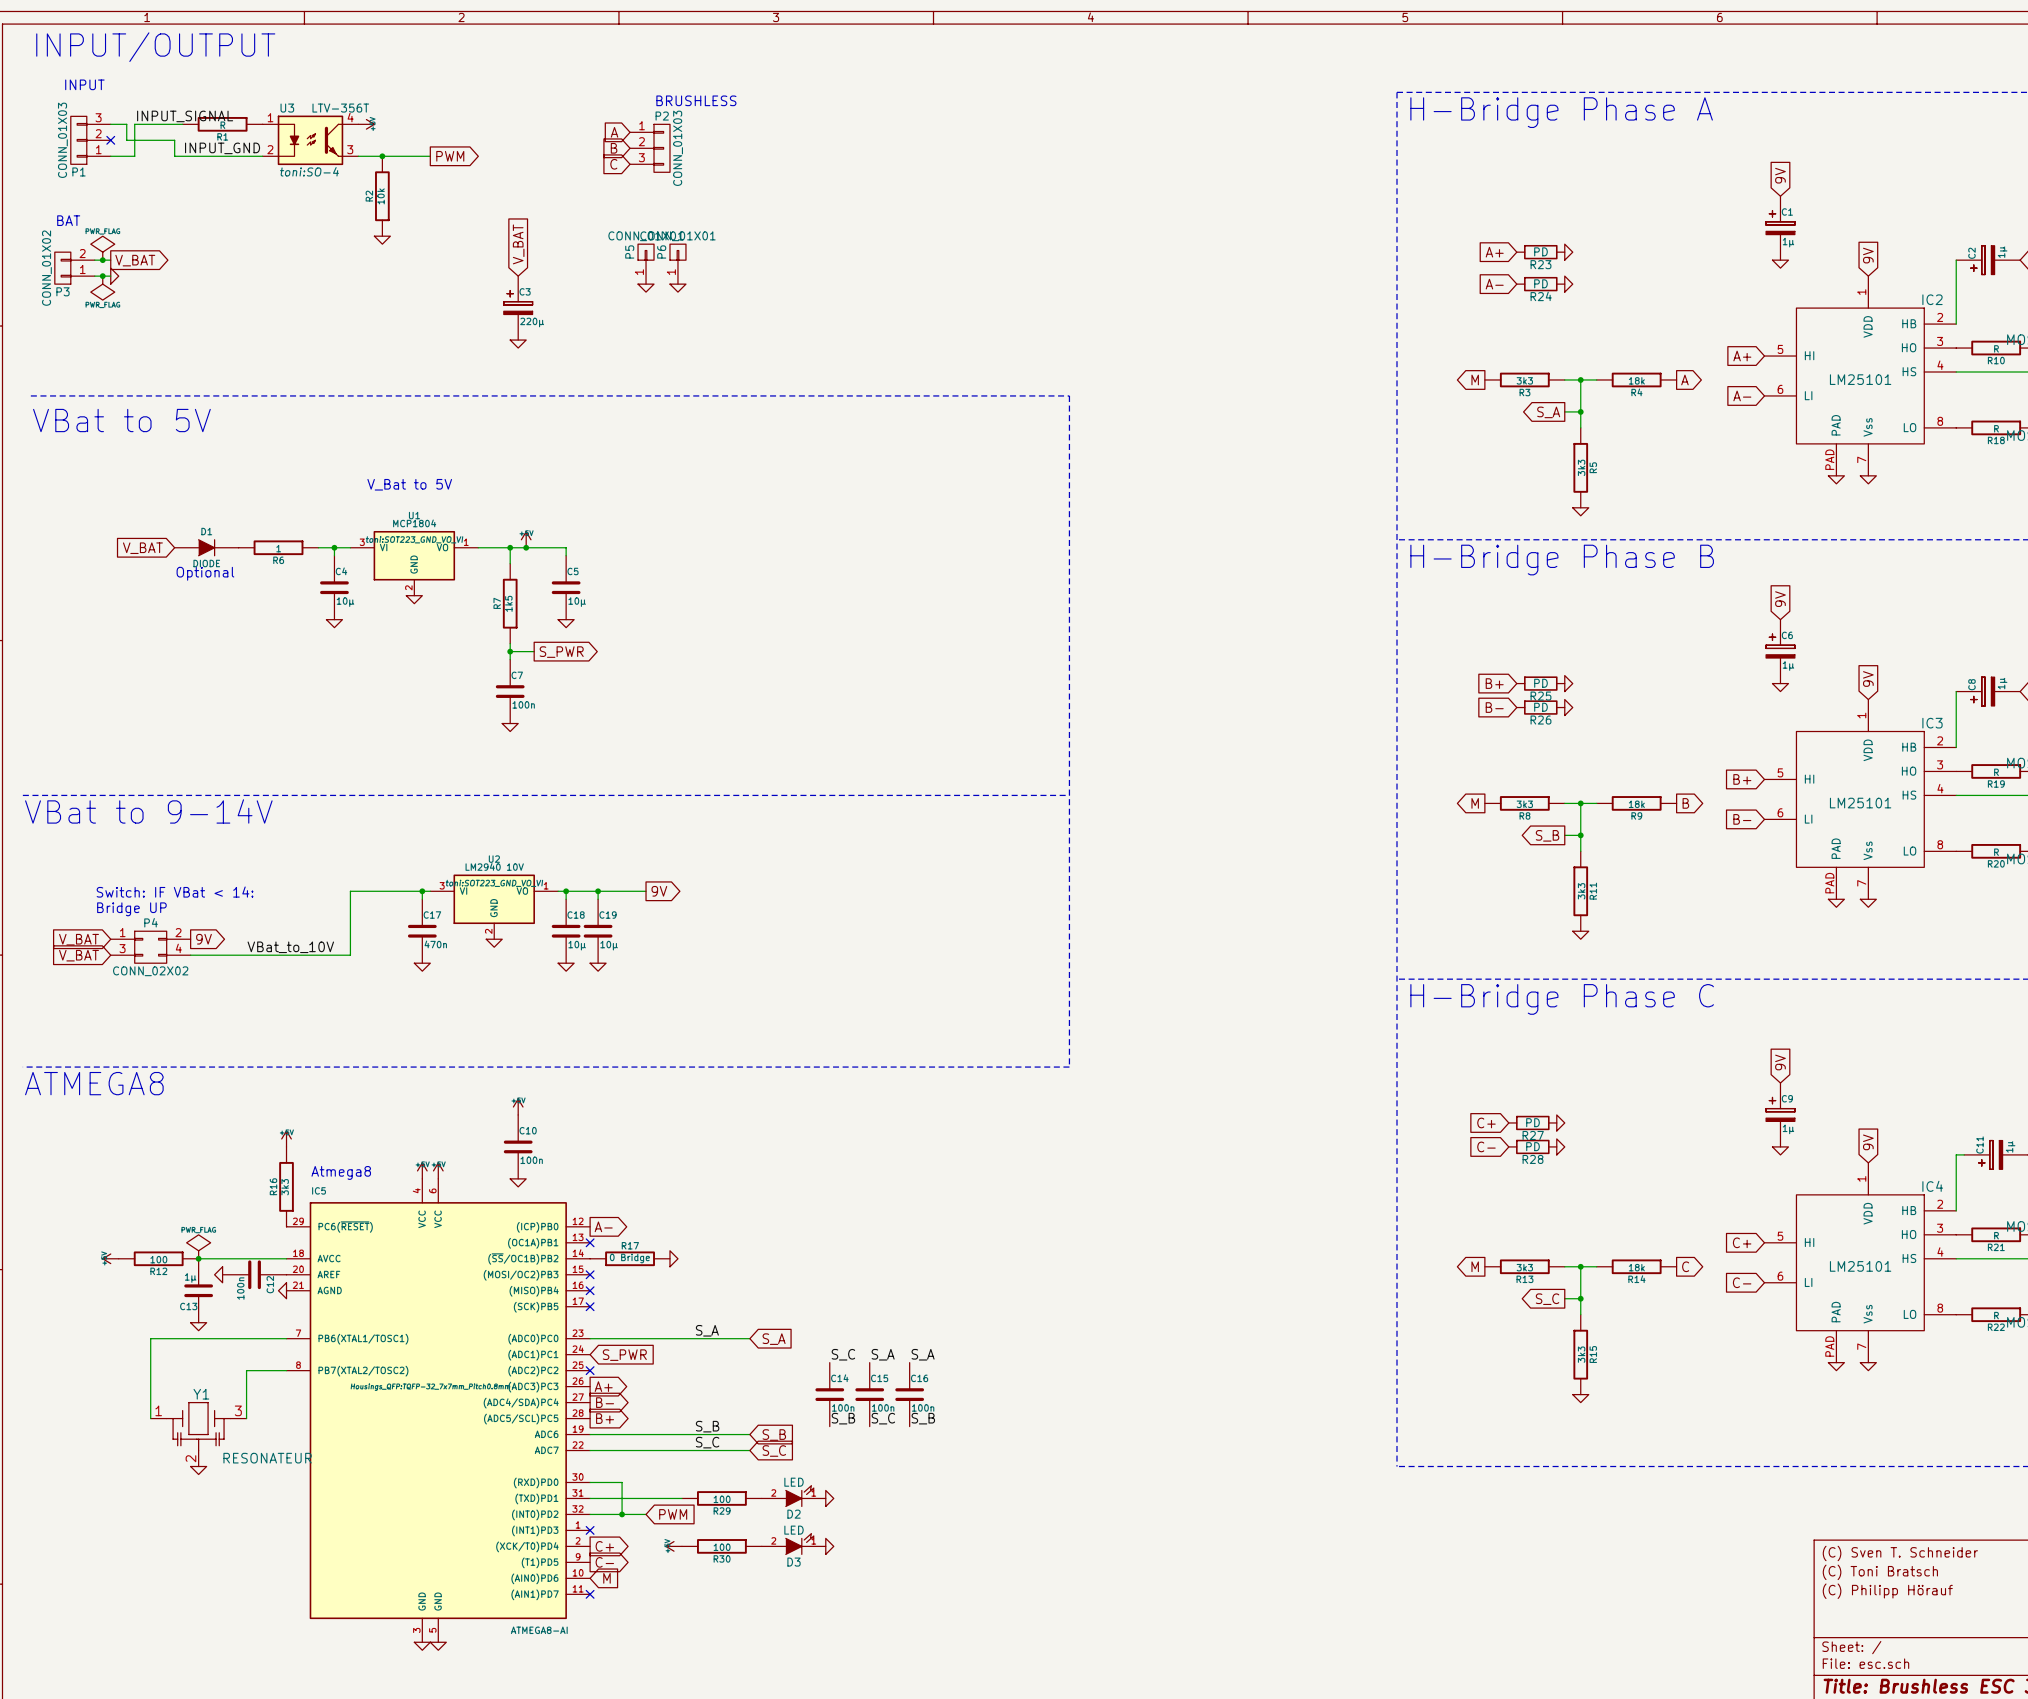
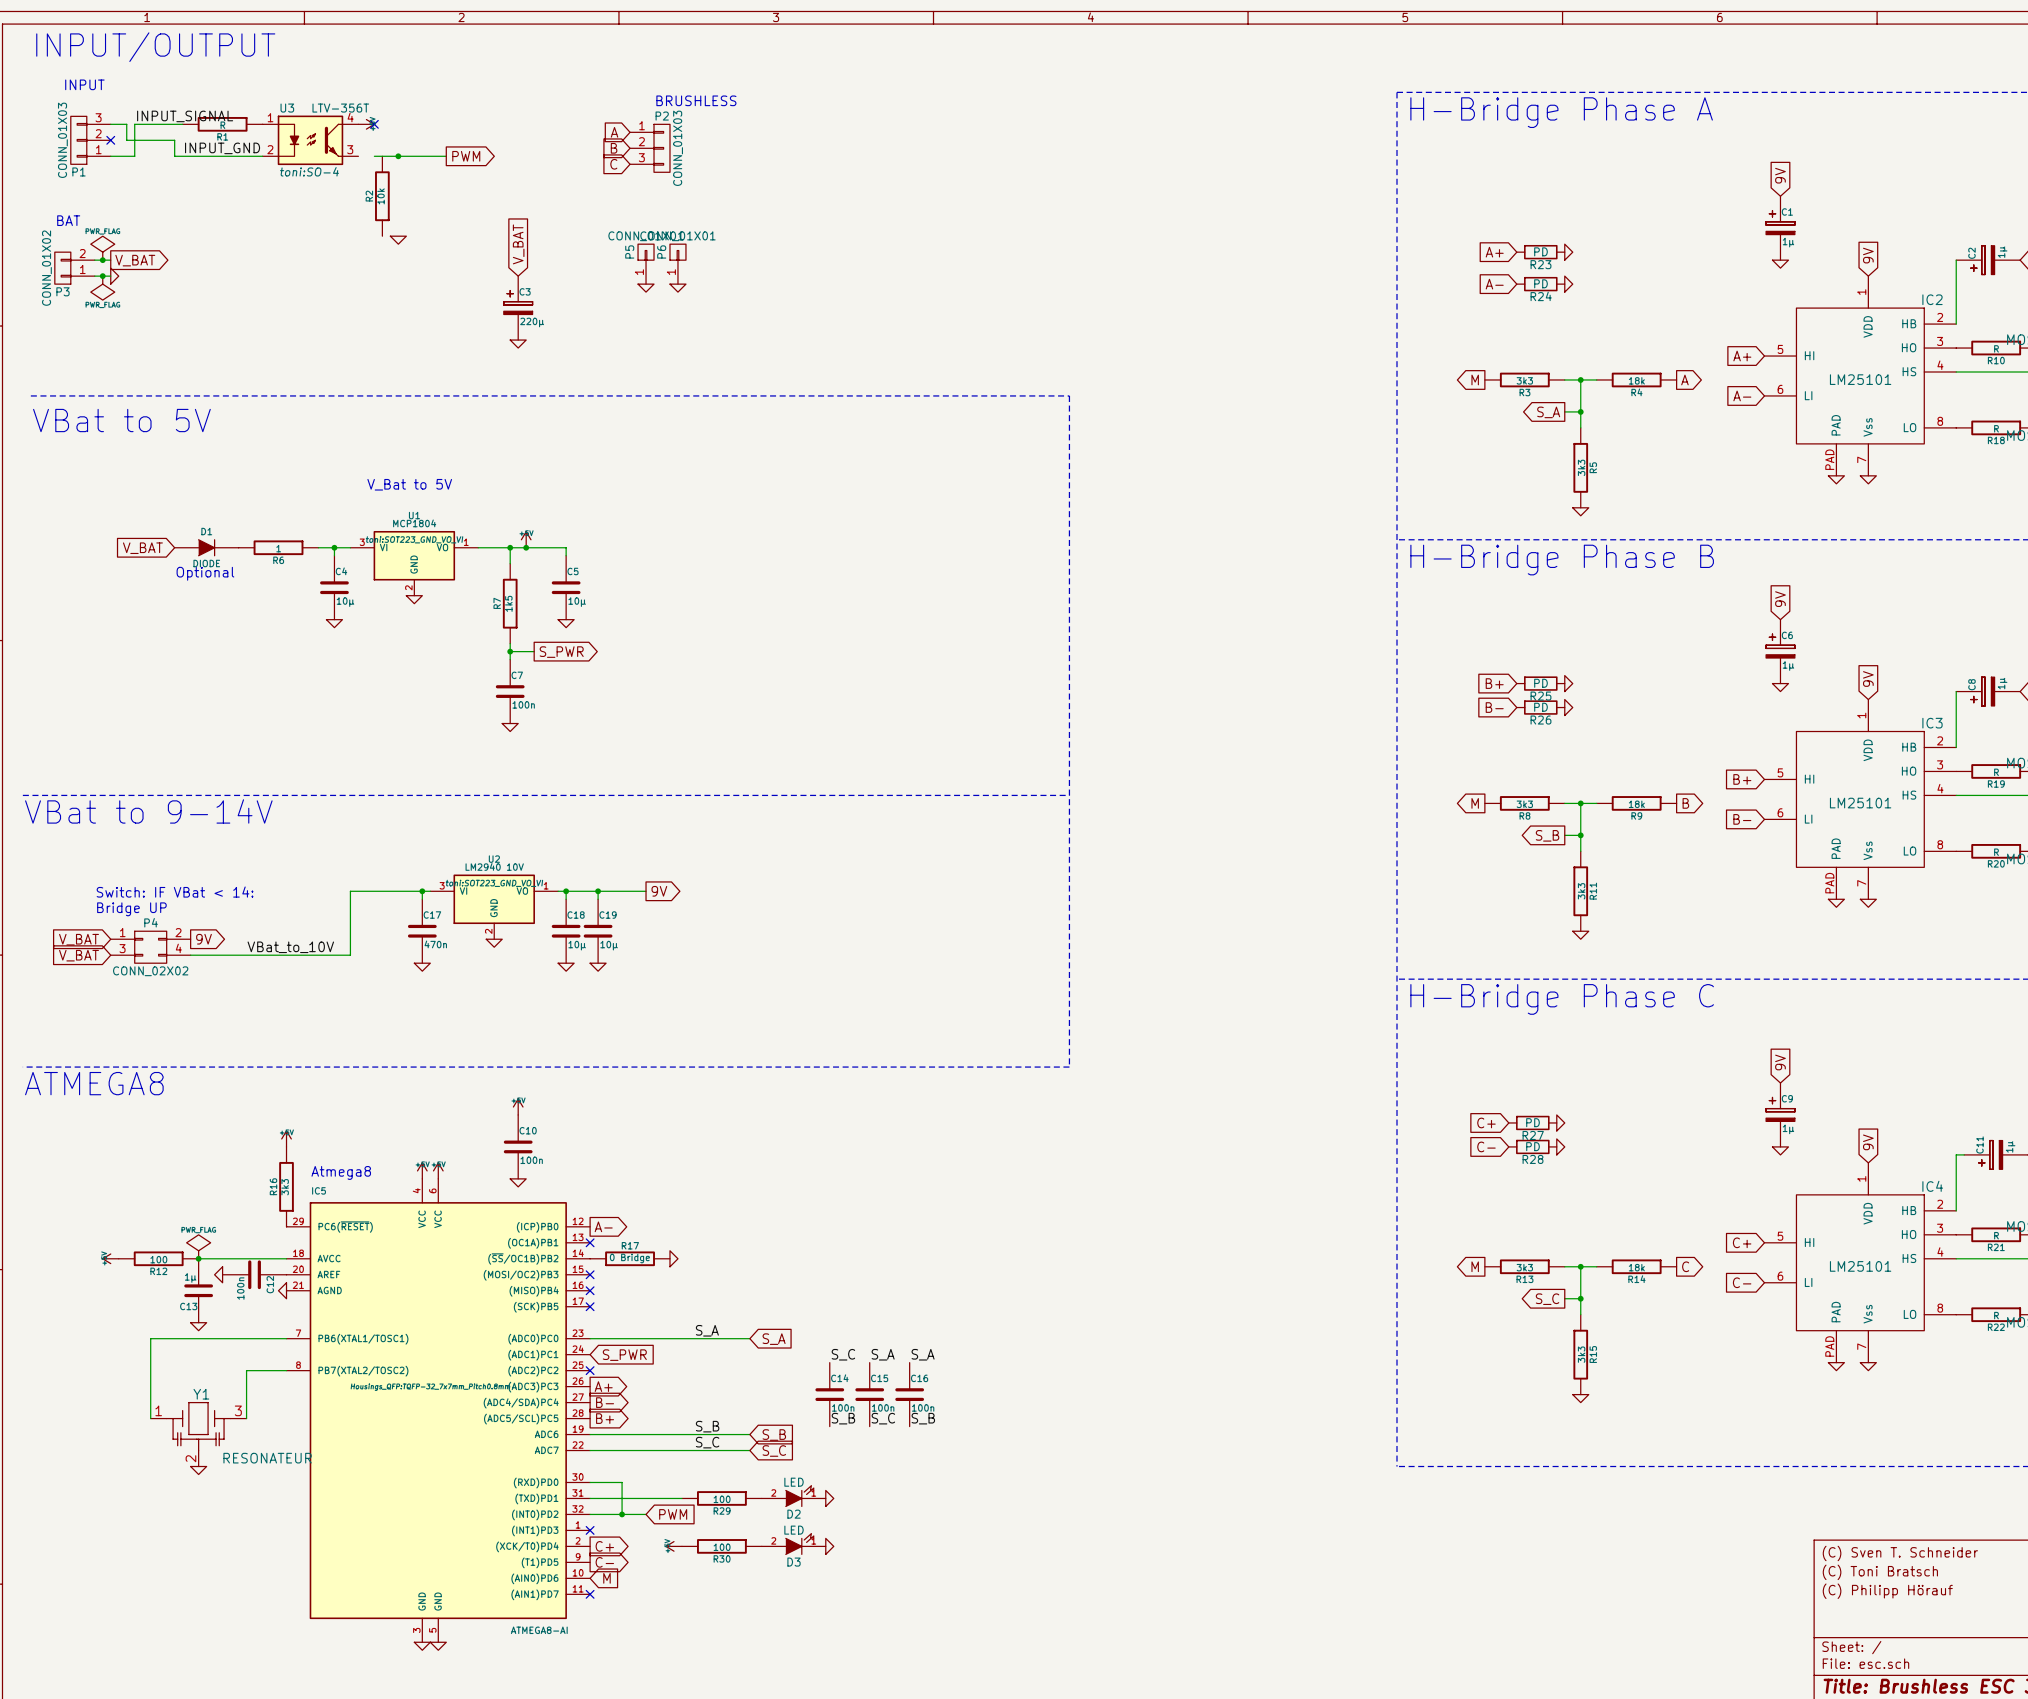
no-connect mark: none -> (374, 124)
wire: (358, 156) (374, 156) -> (430, 156) (446, 156)
junction position: (382, 156) -> (398, 156)
global label position: PWM (450, 156) -> PWM (466, 156)
power symbol position: (382, 240) -> (398, 240)

